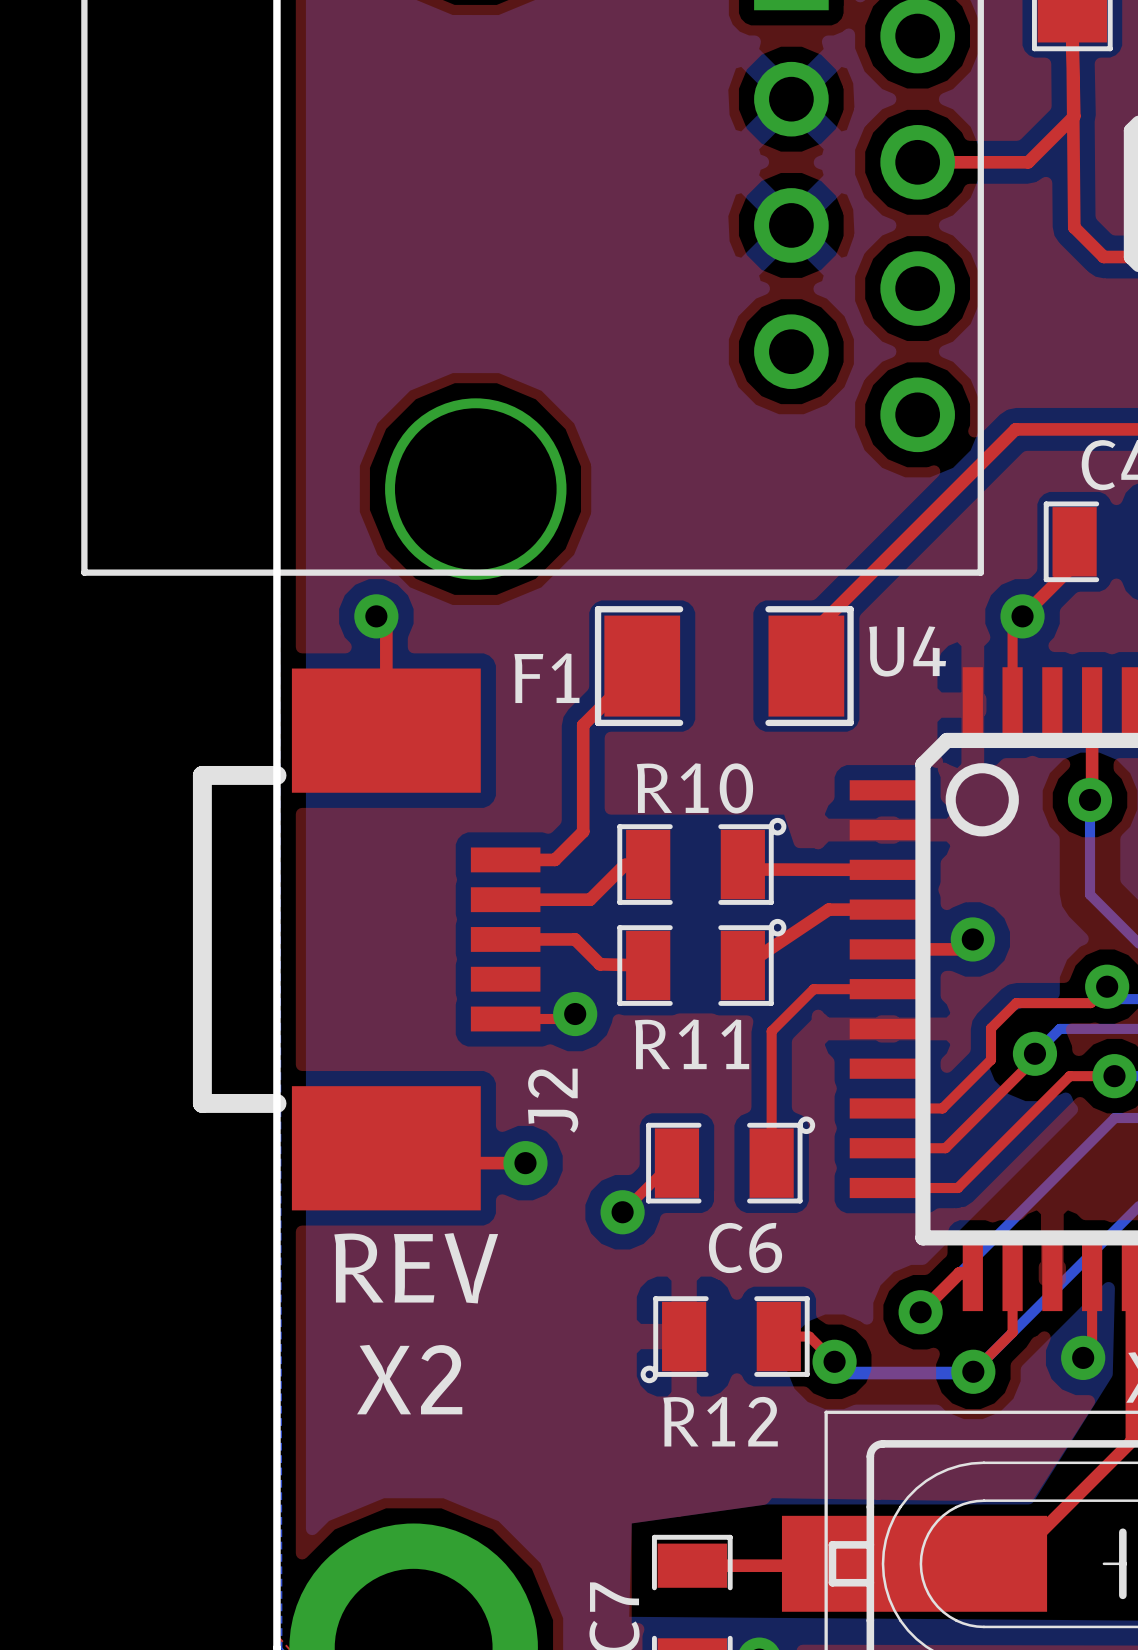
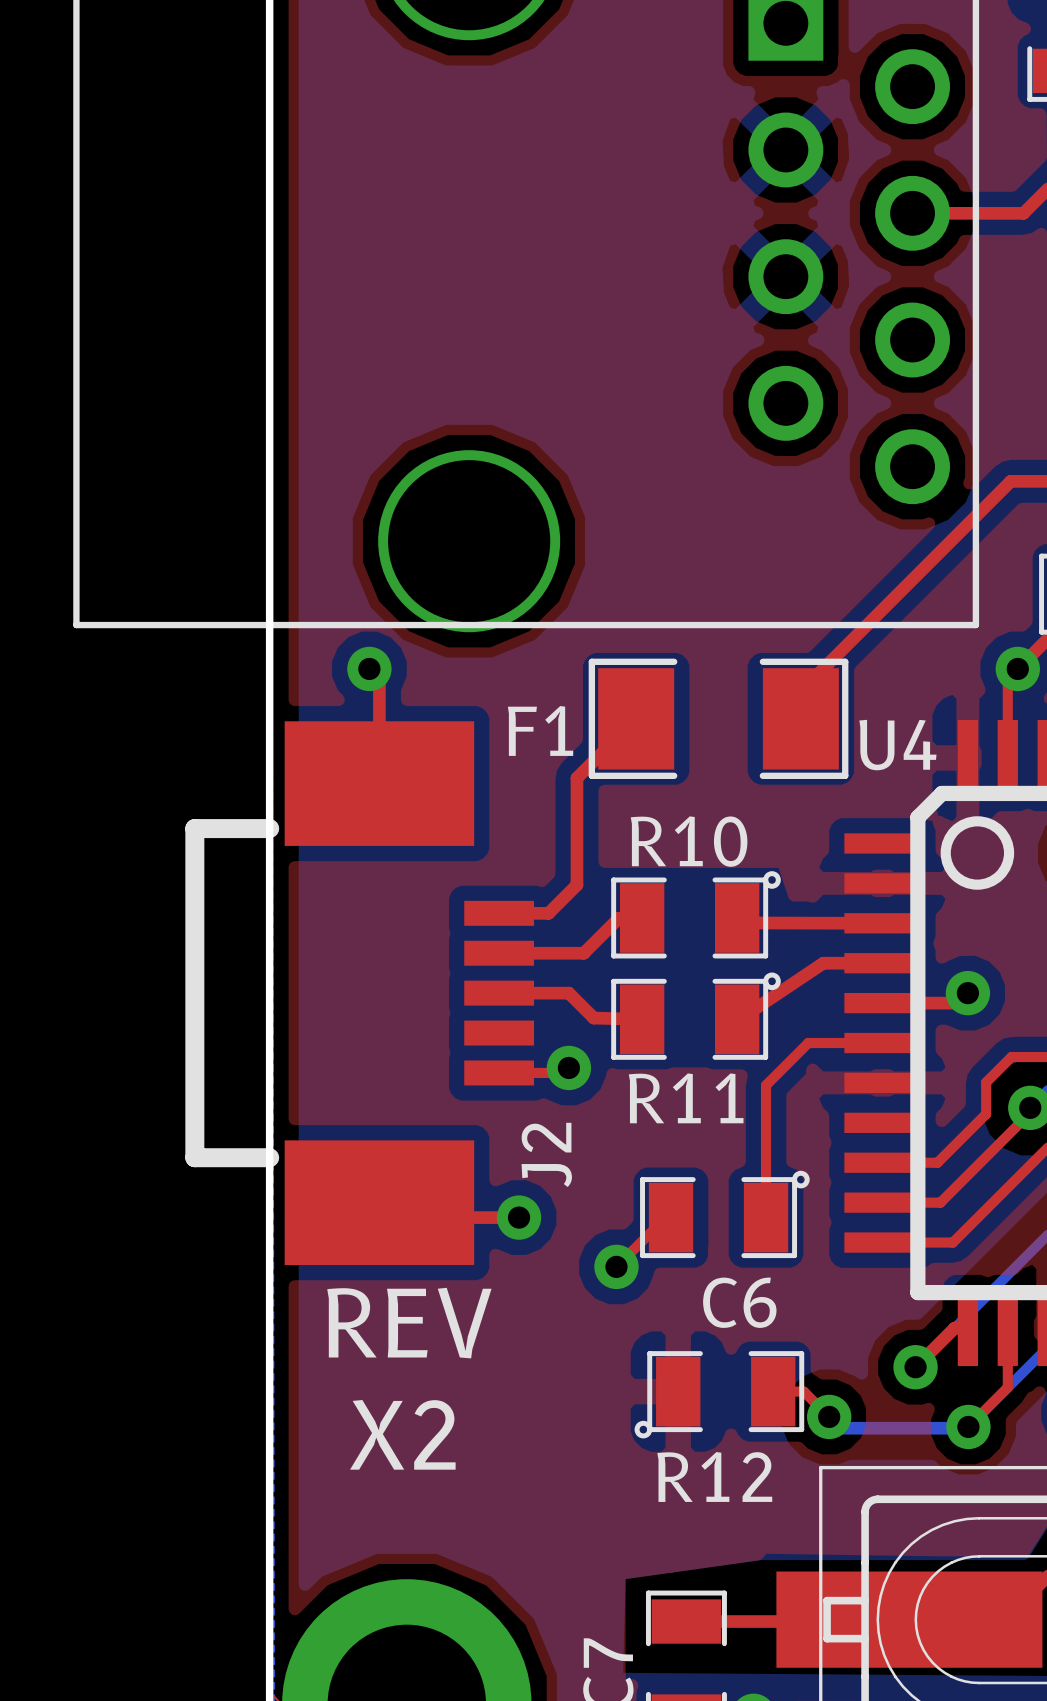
U4 name position: U4 (907, 651) -> U4 (897, 745)

